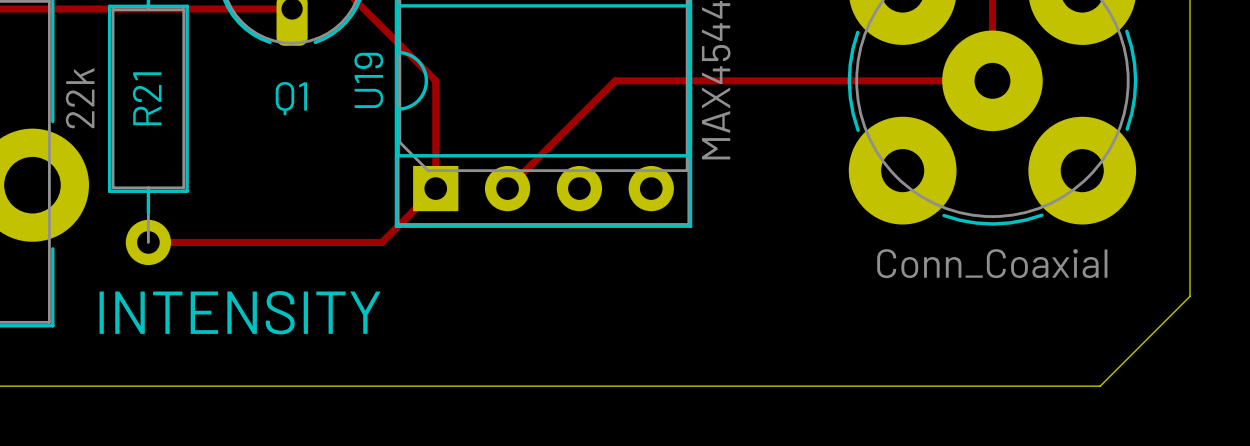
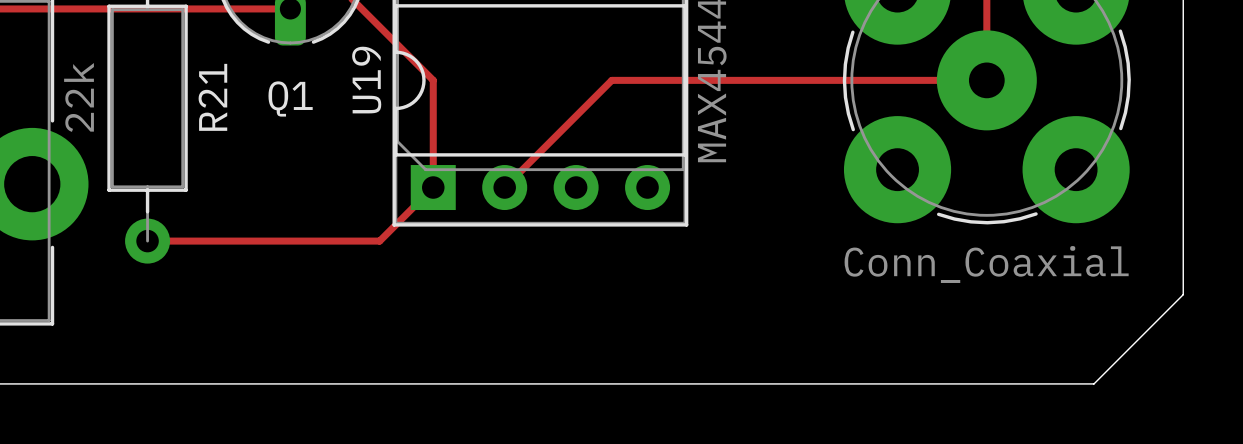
R21 name position: R21 (147, 98) -> R21 (212, 97)
text: INTENSITY (239, 312) -> none

